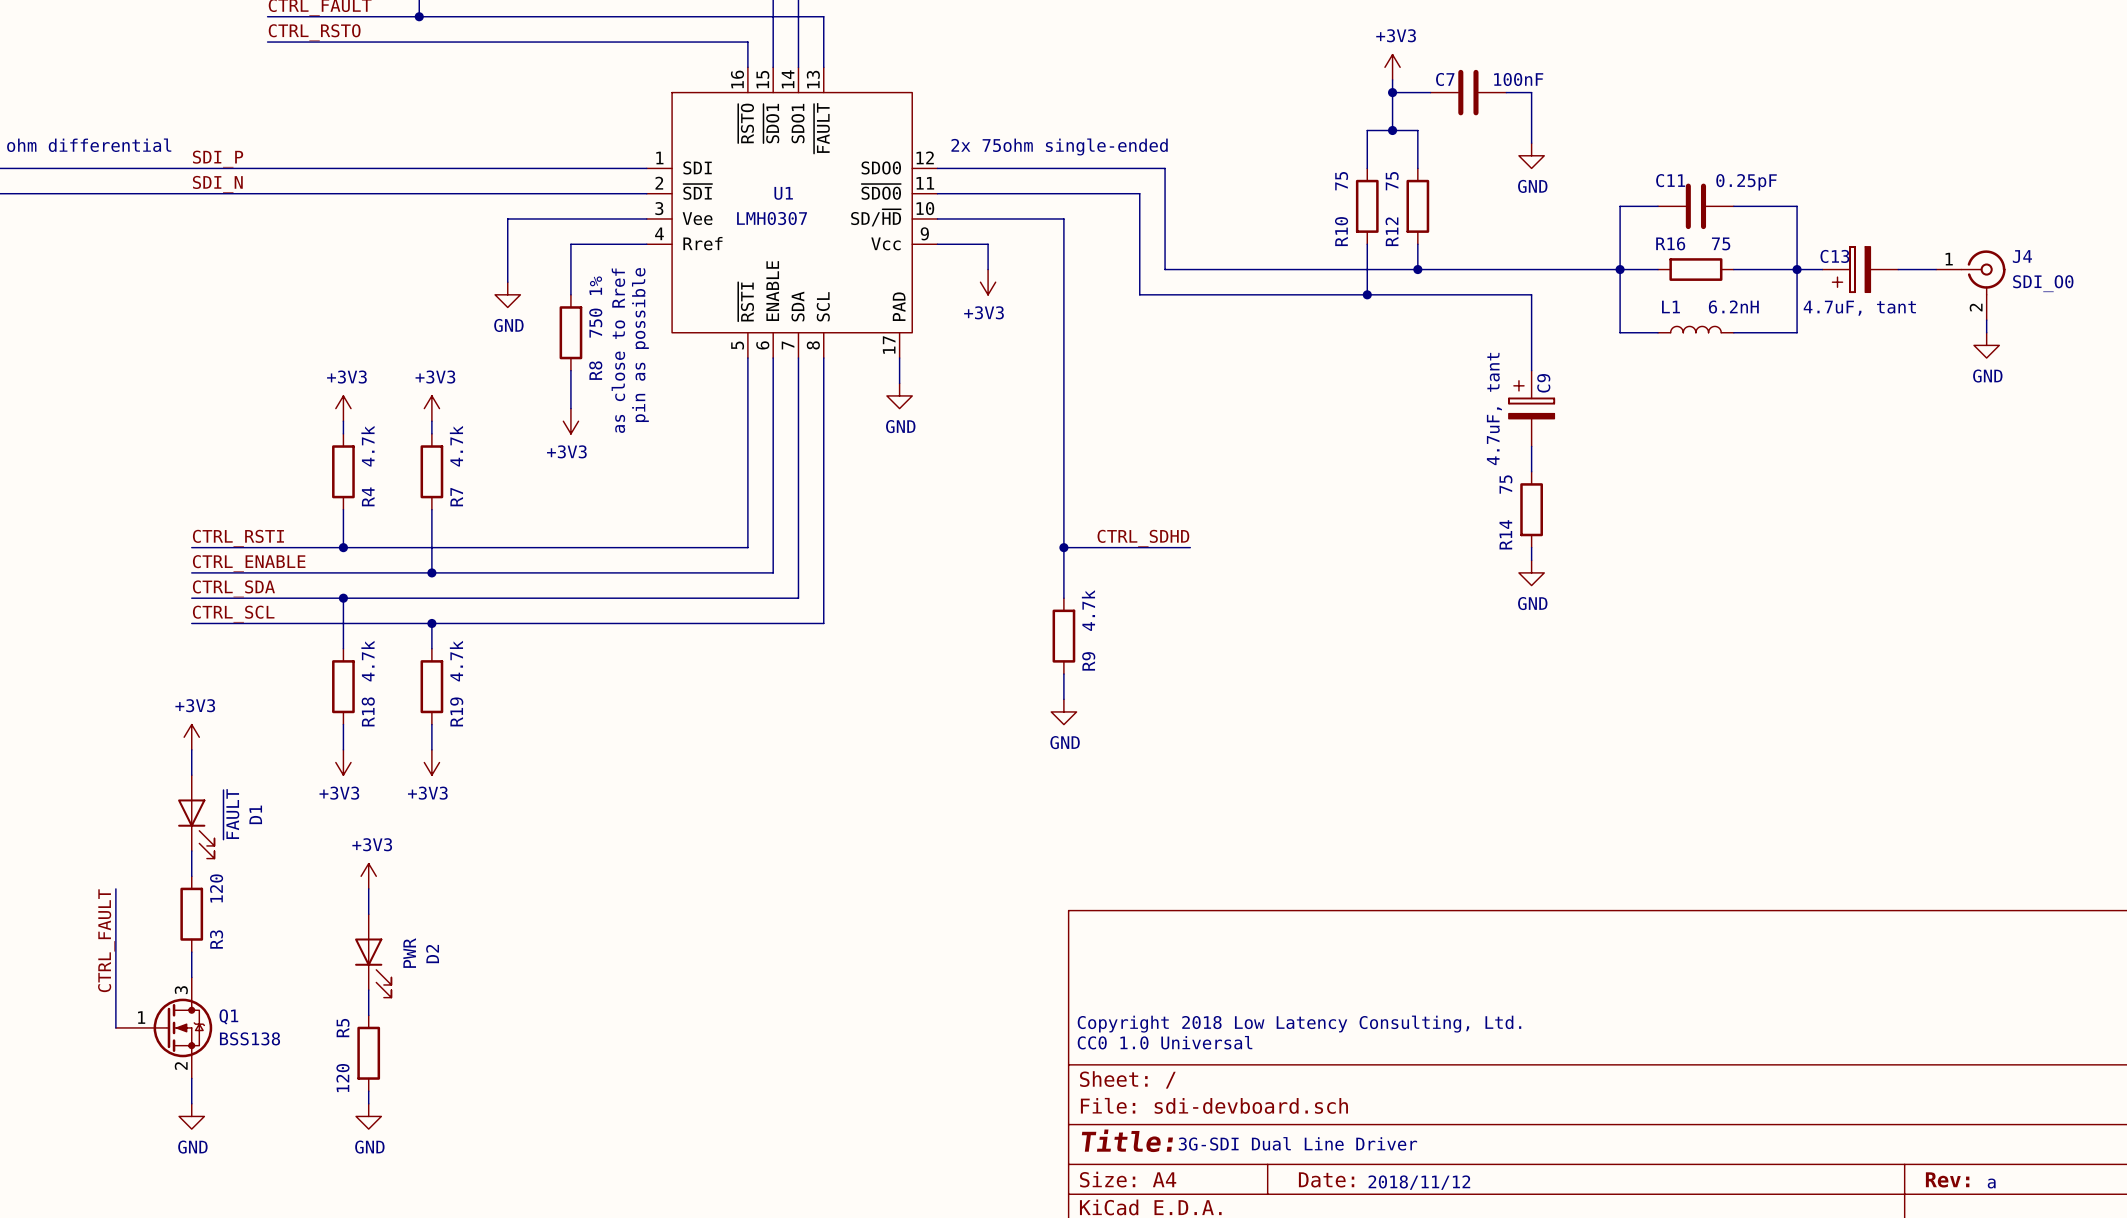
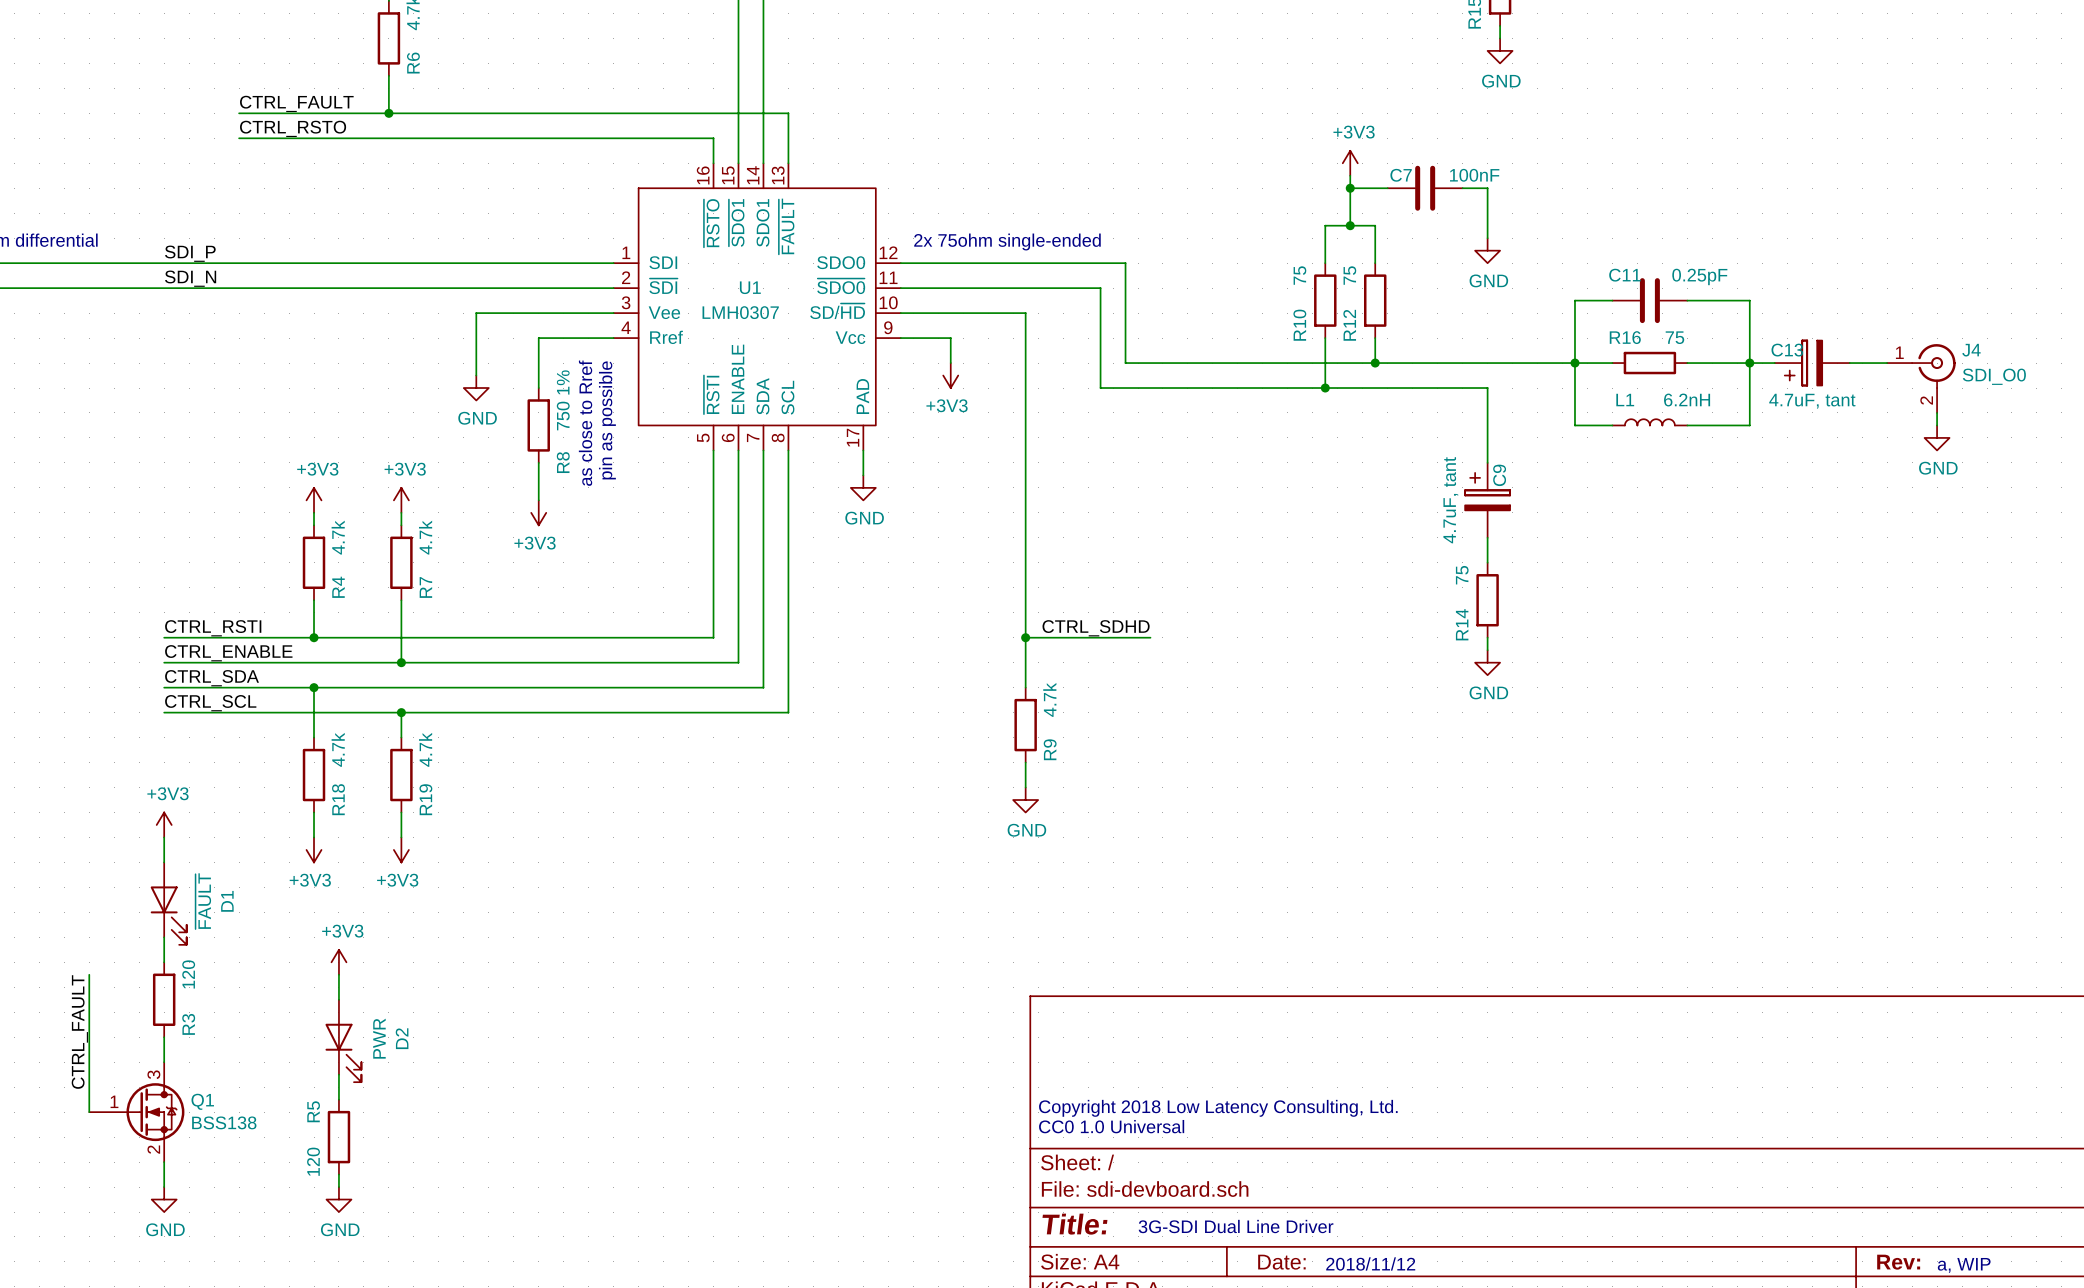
text: a (1991, 1183) -> a, WIP (1964, 1265)

